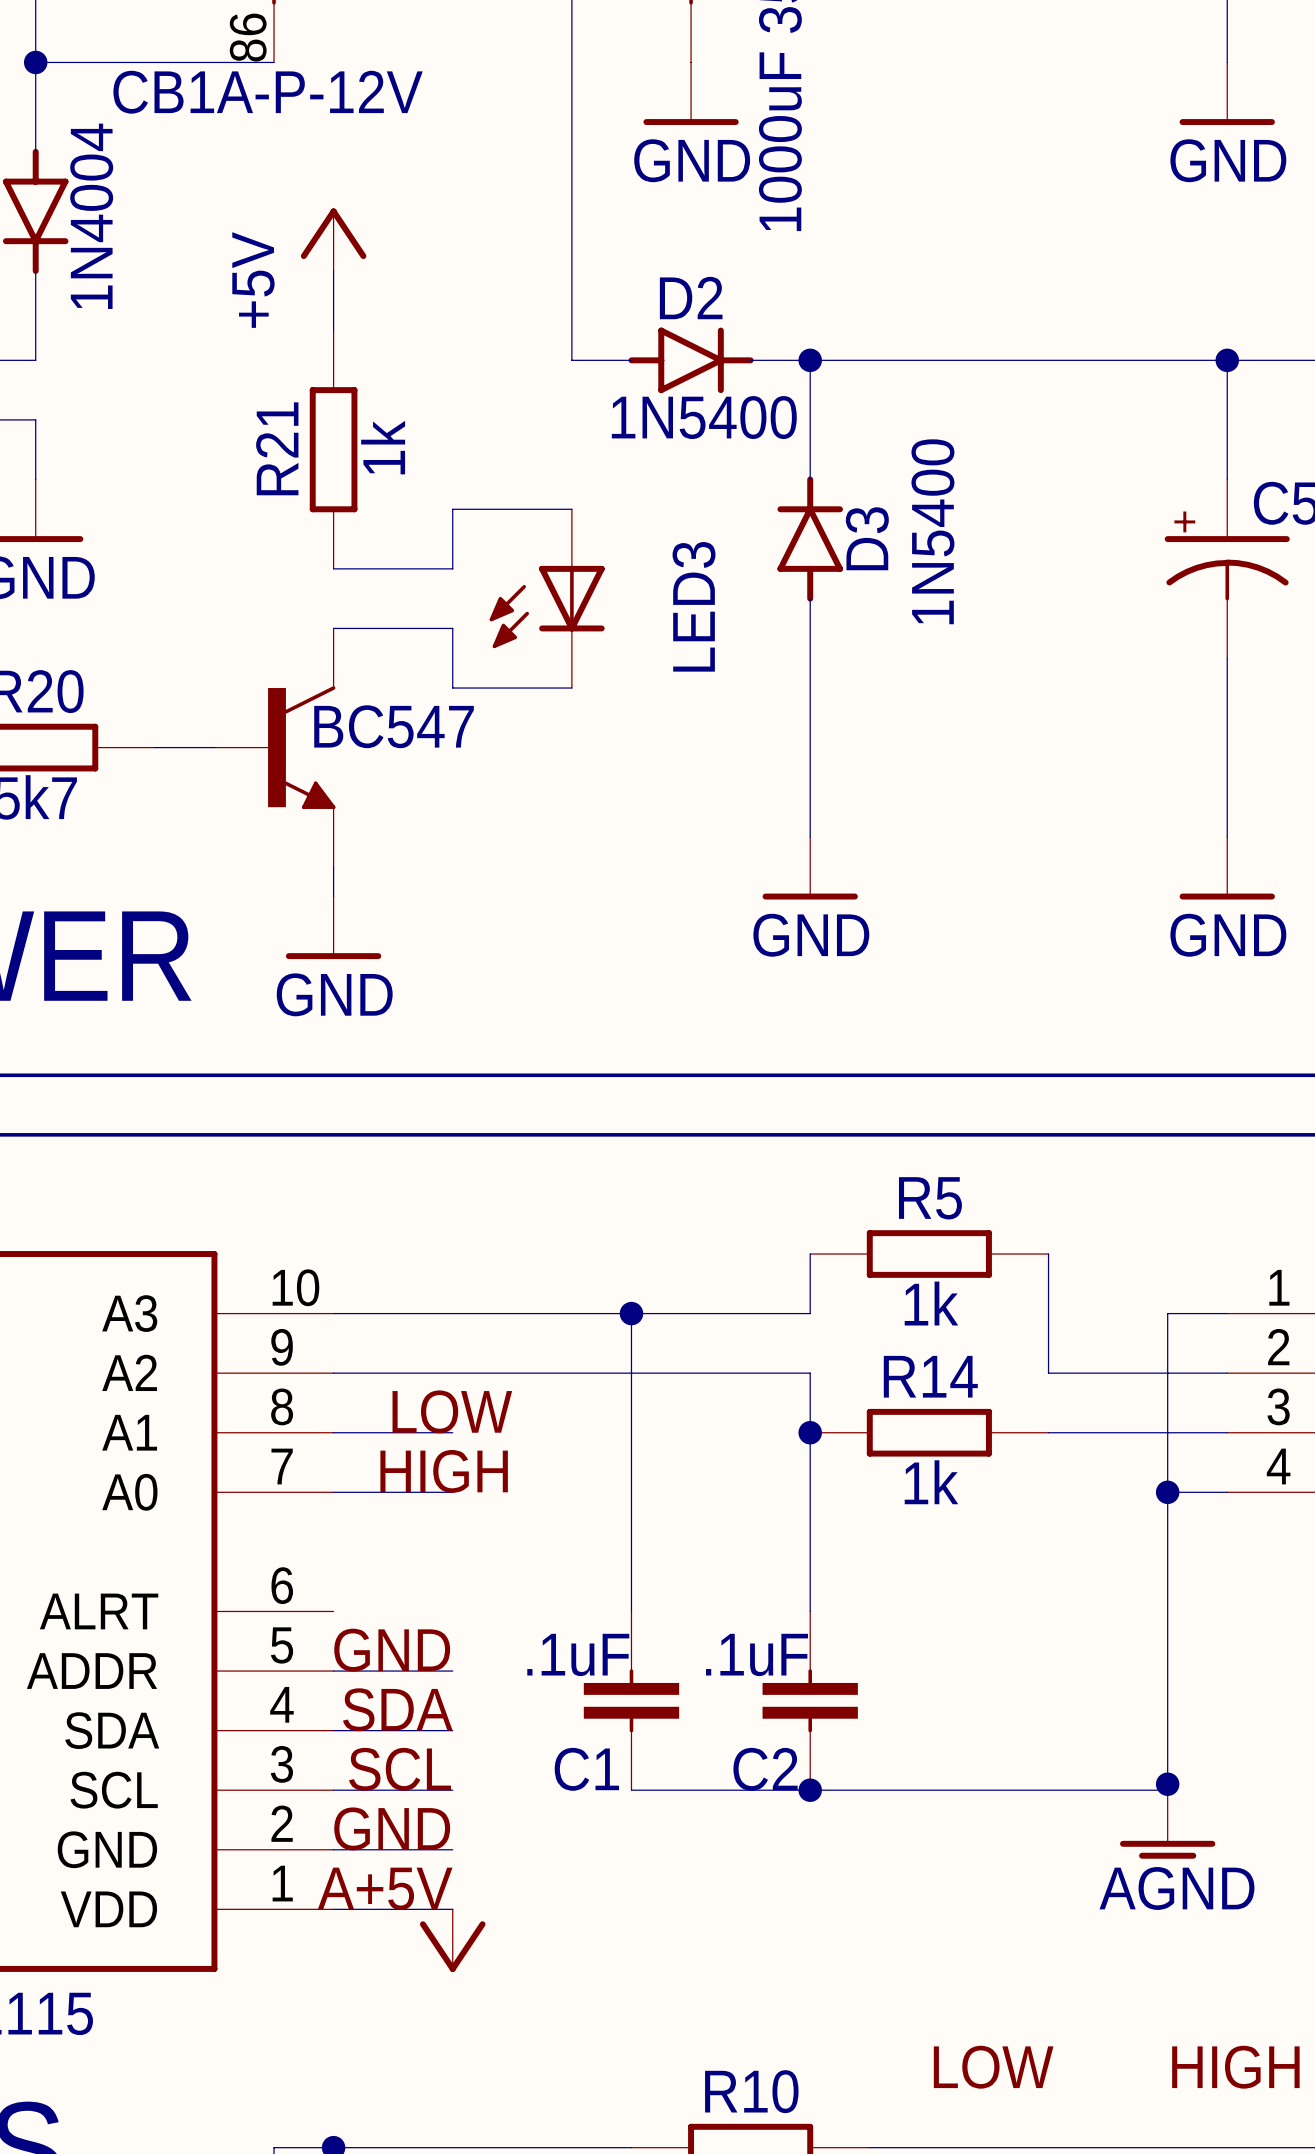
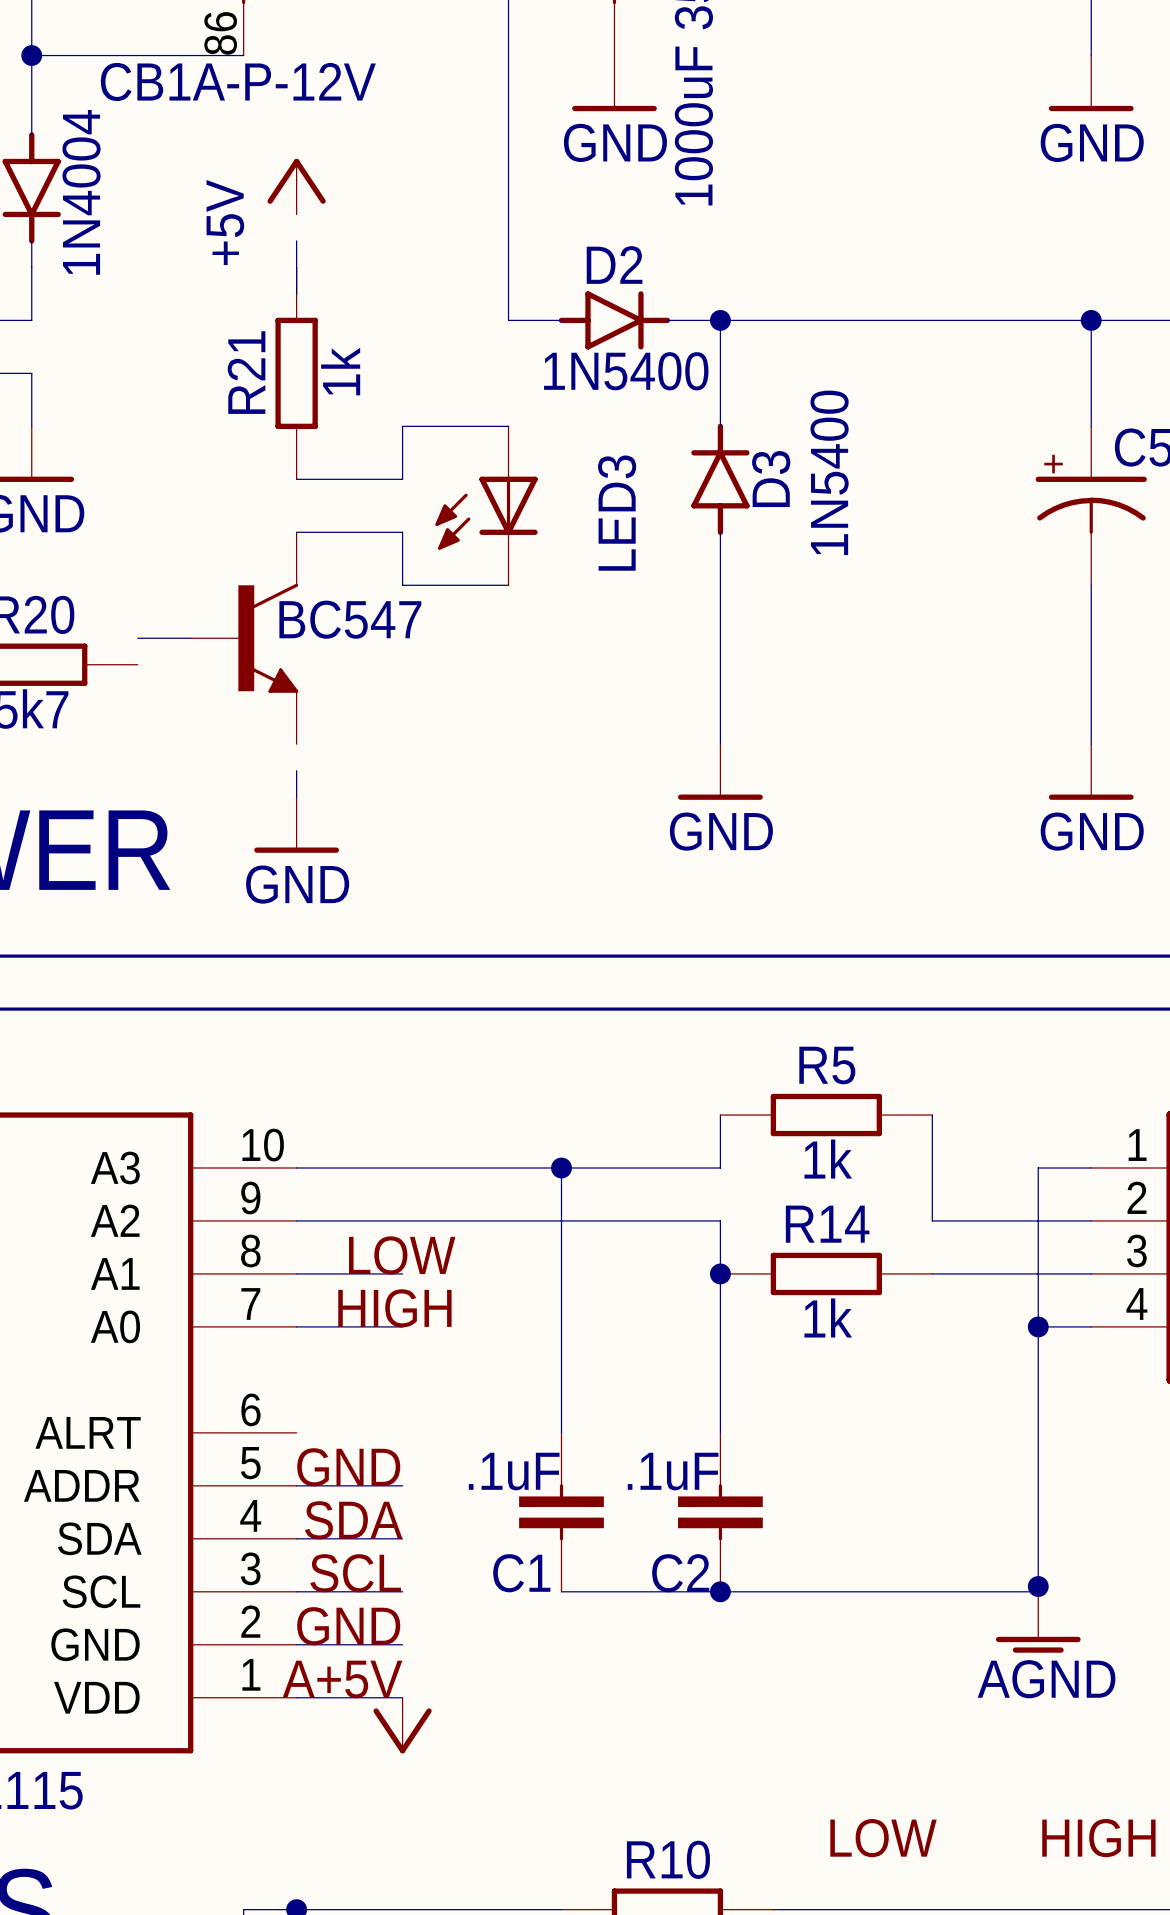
power symbol position: +5V (333, 239) -> +5V (296, 186)
R21 position: (333, 449) -> (296, 373)
wire: (452, 509) (571, 509) -> (402, 452) (402, 426) (508, 426)
wire: (452, 539) (452, 568) (333, 568) -> (402, 479) (296, 479)
LED3 position: (547, 598) -> (486, 505)
wire: (333, 628) (452, 628) -> (296, 532) (402, 532) (402, 558)
wire: (452, 658) (452, 688) (571, 688) -> (402, 585) (508, 585)
wire: (154, 747) (214, 747) -> (137, 638) (190, 638)
part position: (274, 747) -> (244, 638)

